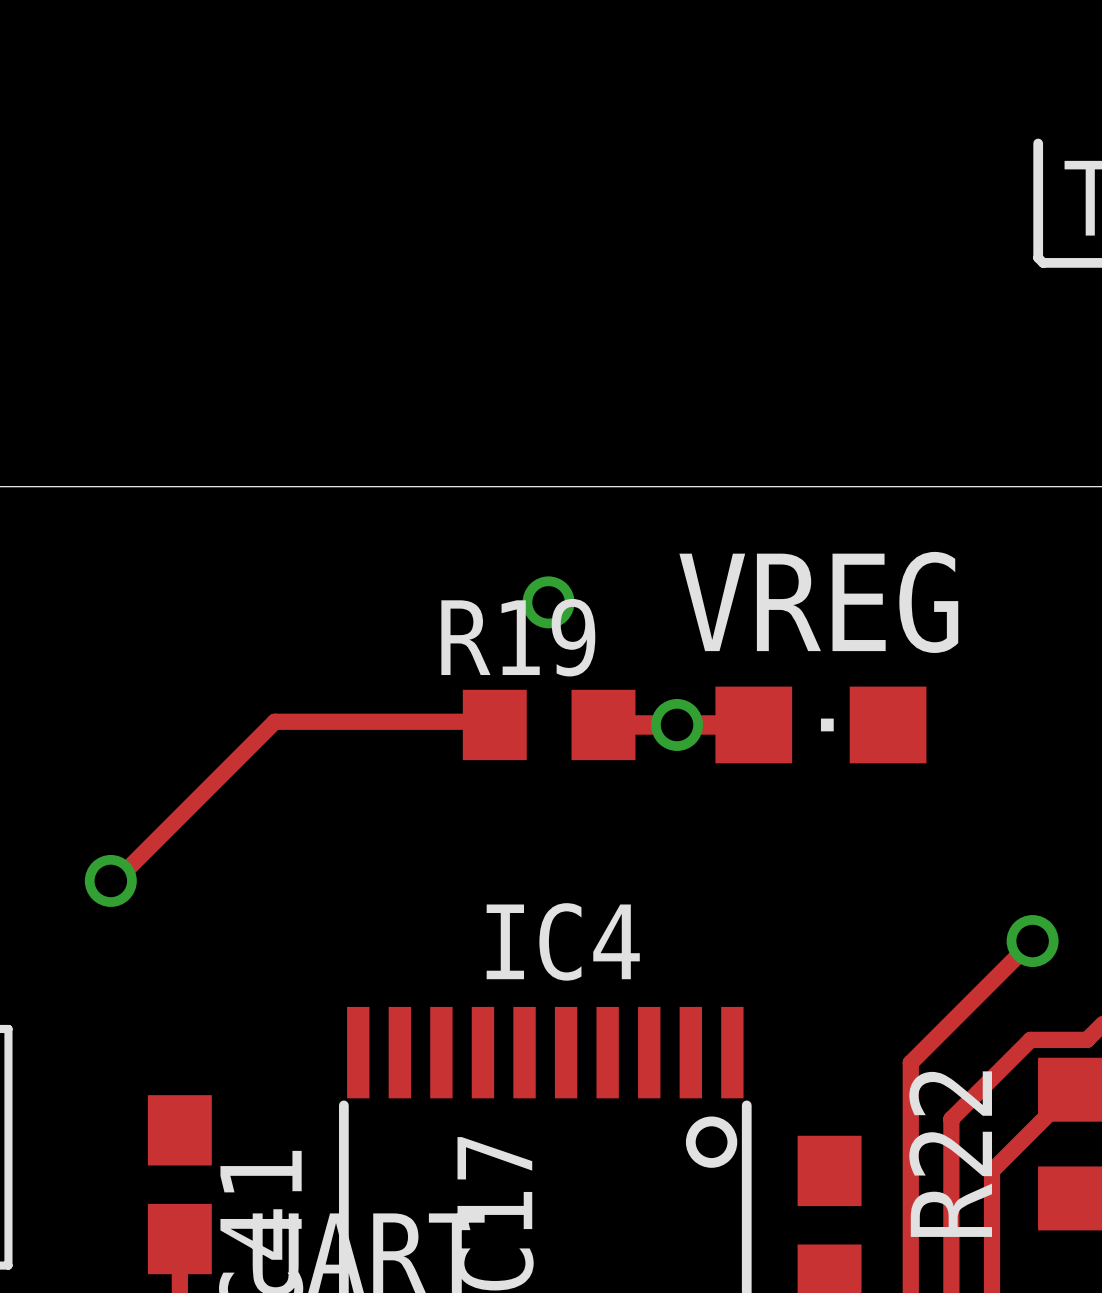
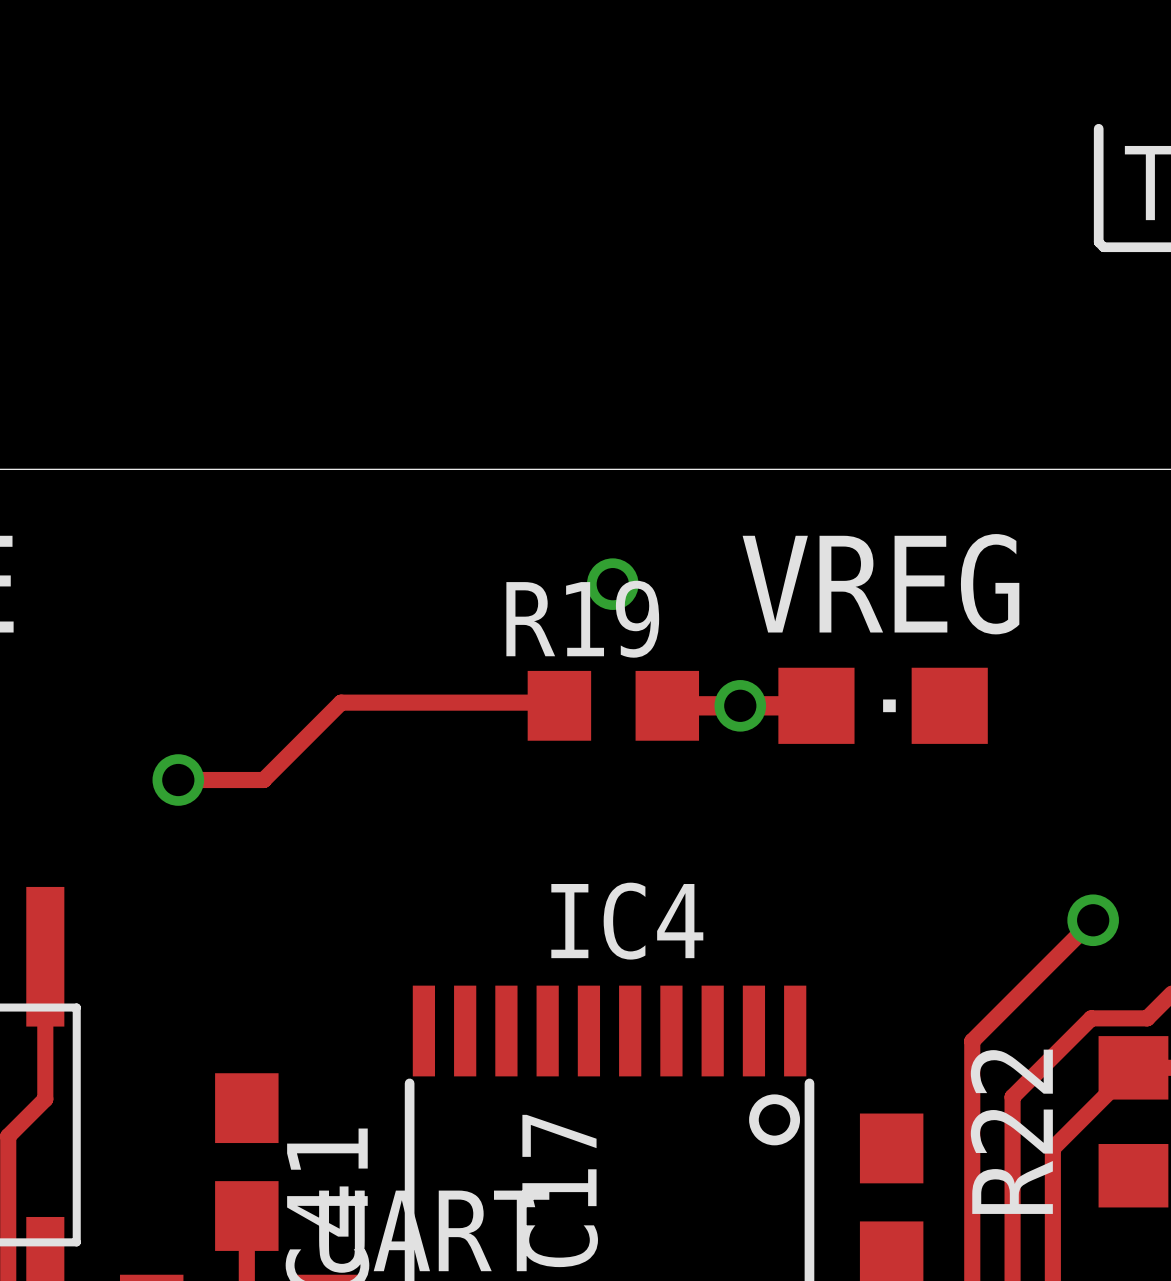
track: (196, 799) (115, 880) (110, 880) -> (263, 780) (178, 780)
via position: (110, 880) -> (178, 780)

